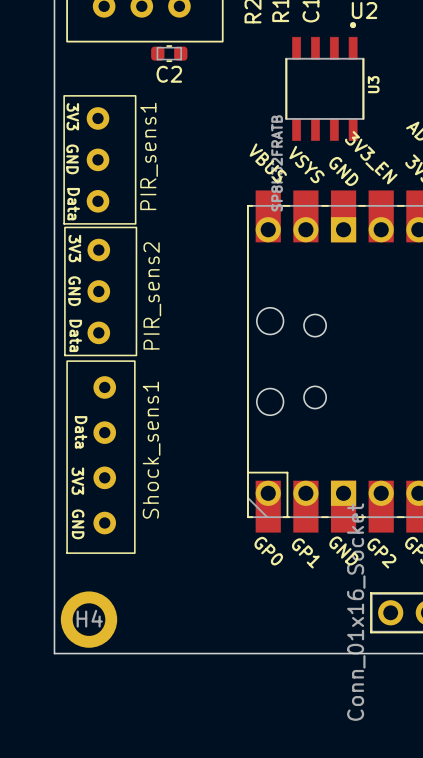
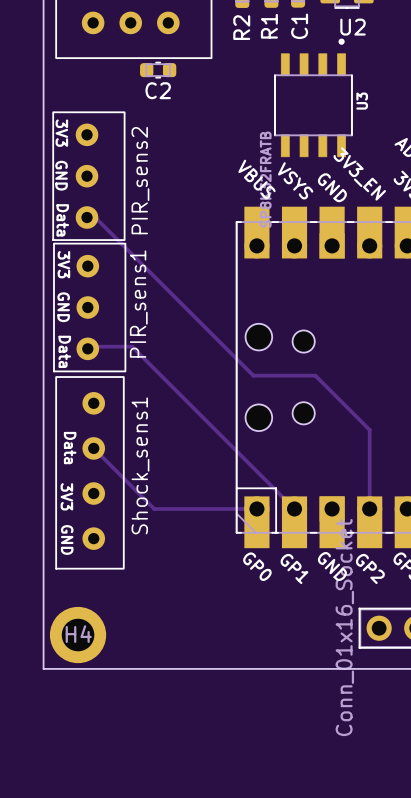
PIR_sens1 name: PIR_sens1 (149, 156) -> PIR_sens2 (140, 180)
track: none -> (91, 214) (253, 375) (315, 375) (369, 429) (369, 508)
PIR_sens2 name: PIR_sens2 (152, 295) -> PIR_sens1 (138, 304)
track: none -> (91, 346) (132, 346) (294, 508)
track: none -> (93, 448) (154, 508) (256, 508)

